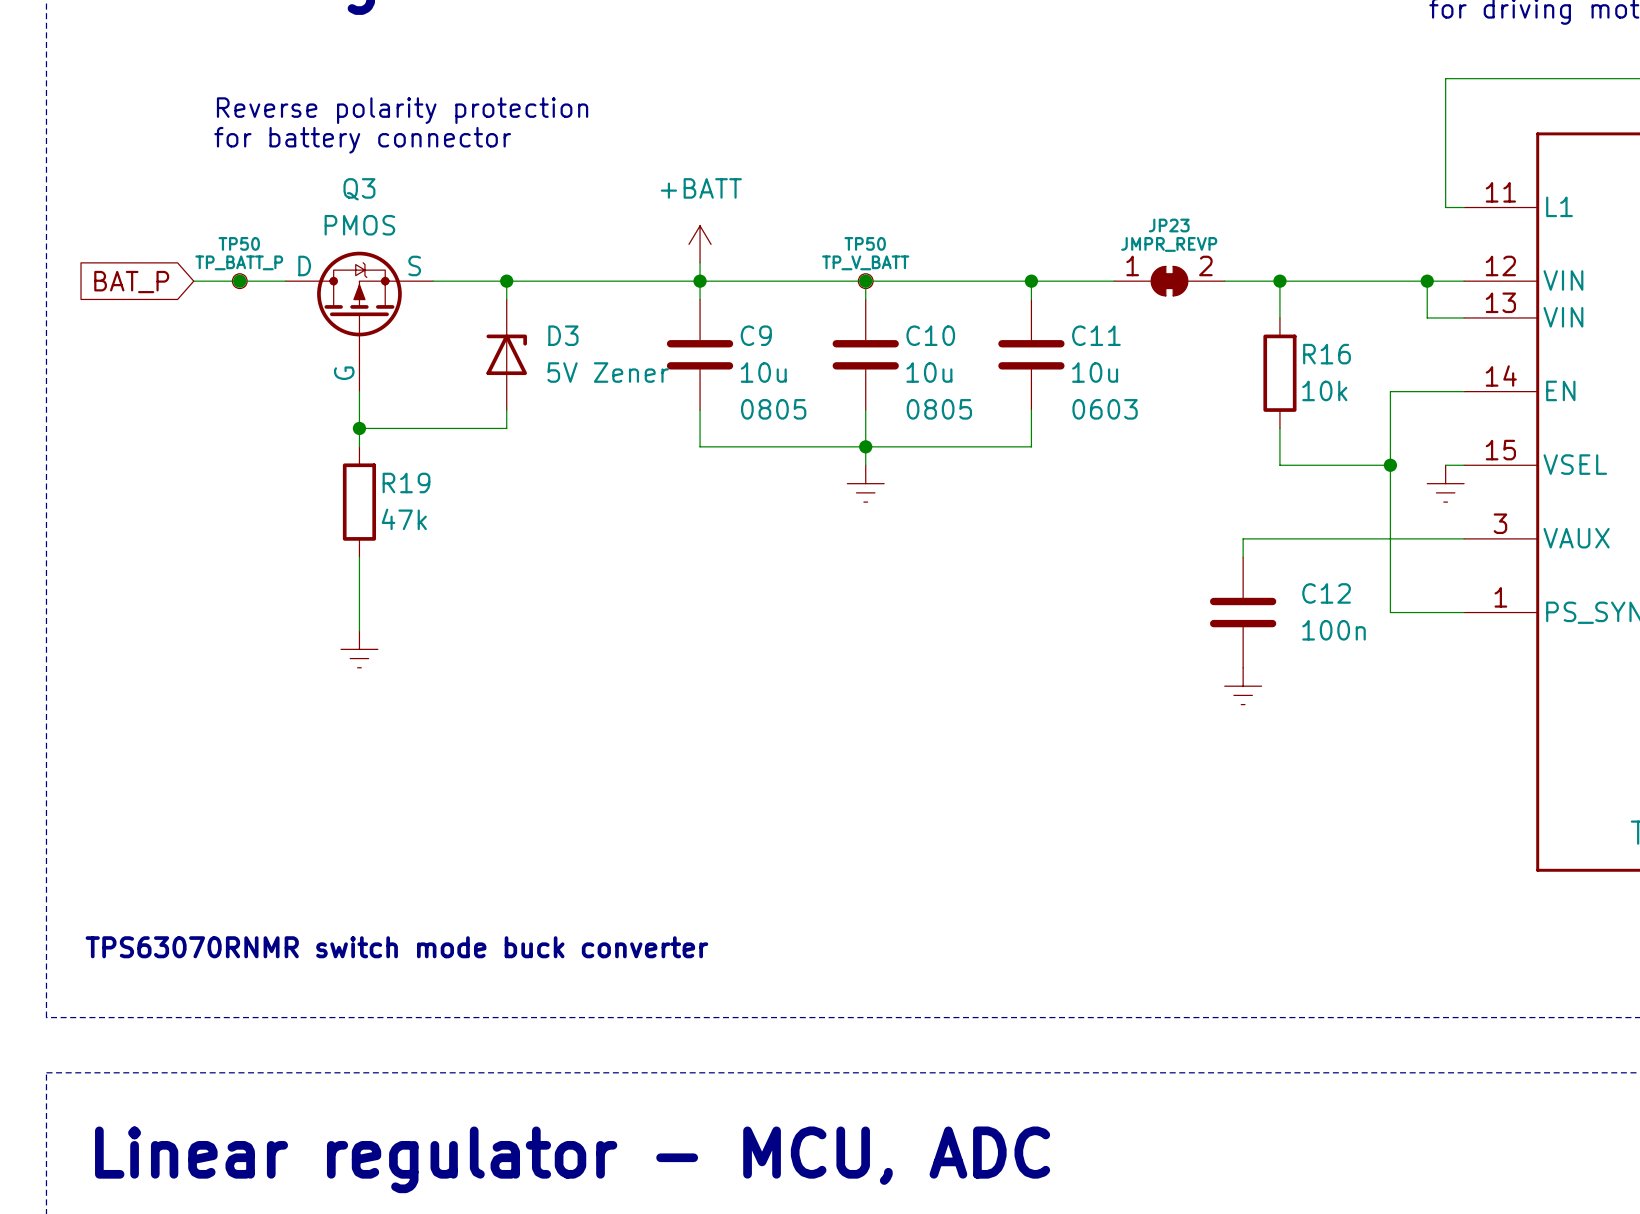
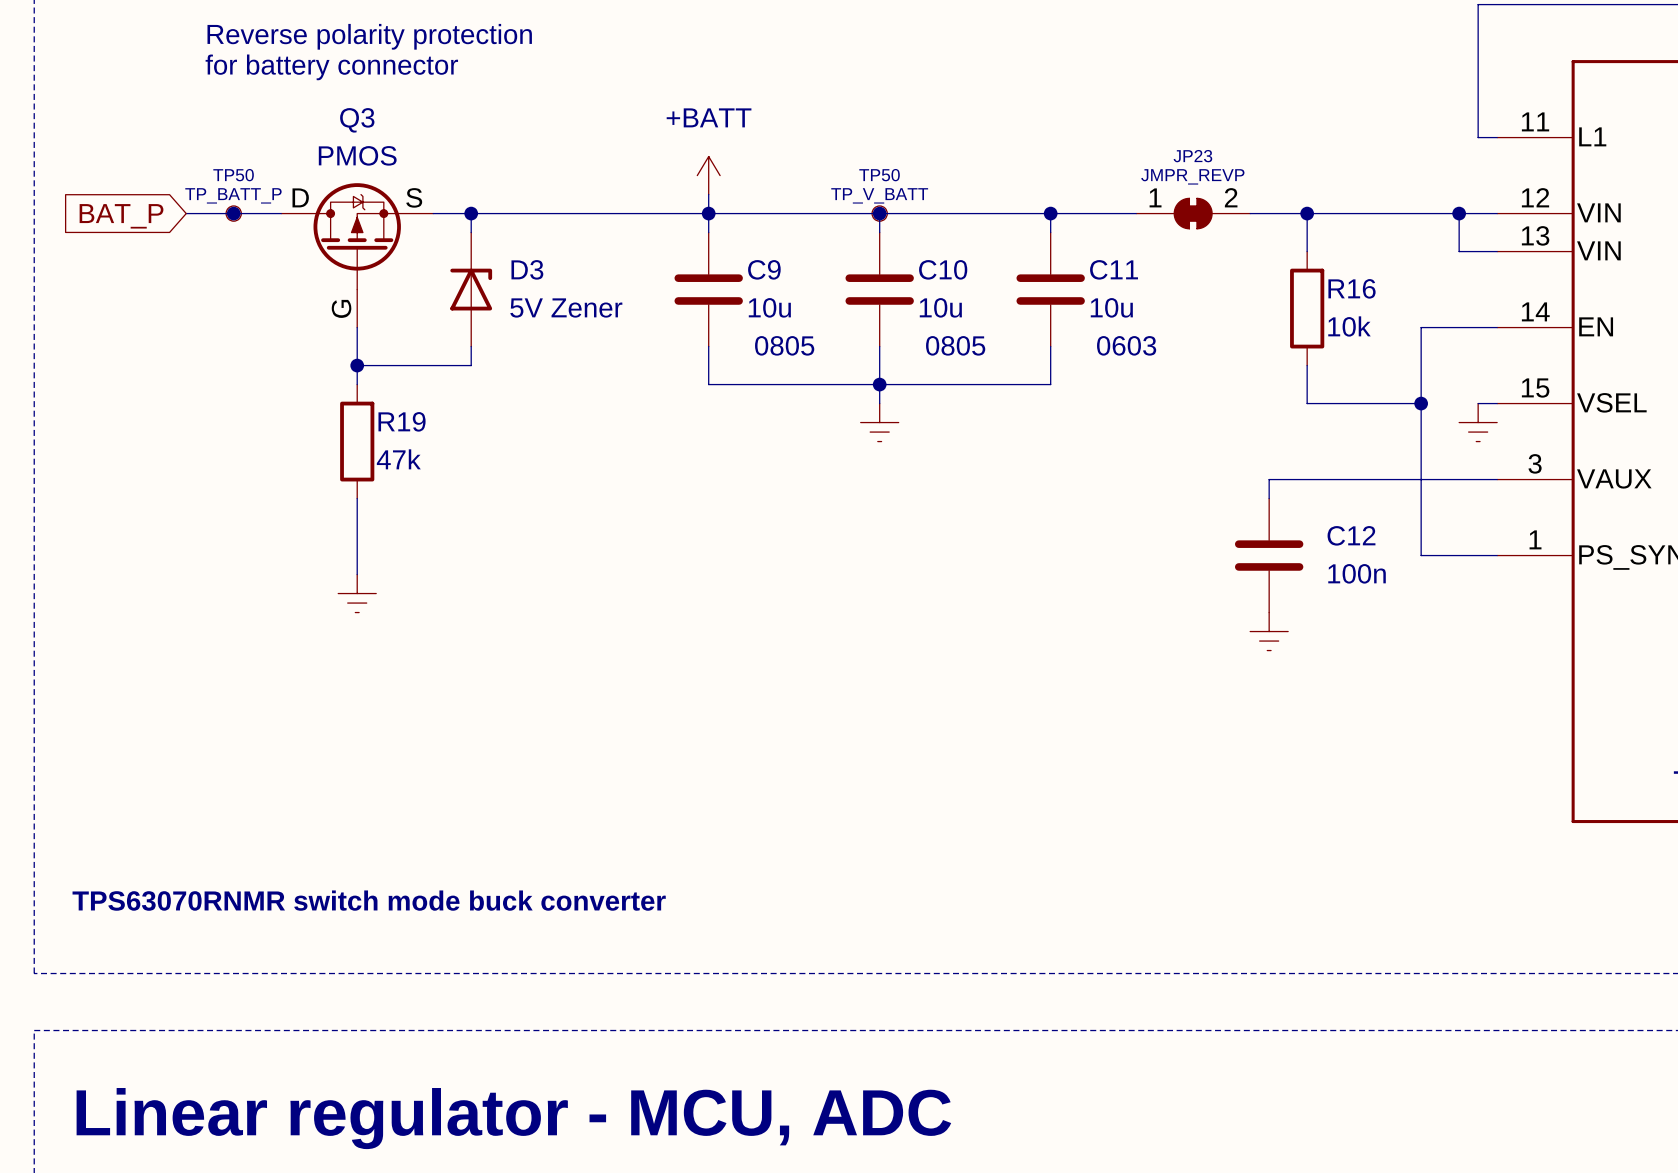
wire: (506, 281) (506, 299) -> (471, 213) (471, 232)
junction position: (506, 281) -> (471, 213)
D3 position: (506, 354) -> (471, 289)
wire: (506, 410) (506, 428) (469, 428) -> (471, 346) (471, 365)

